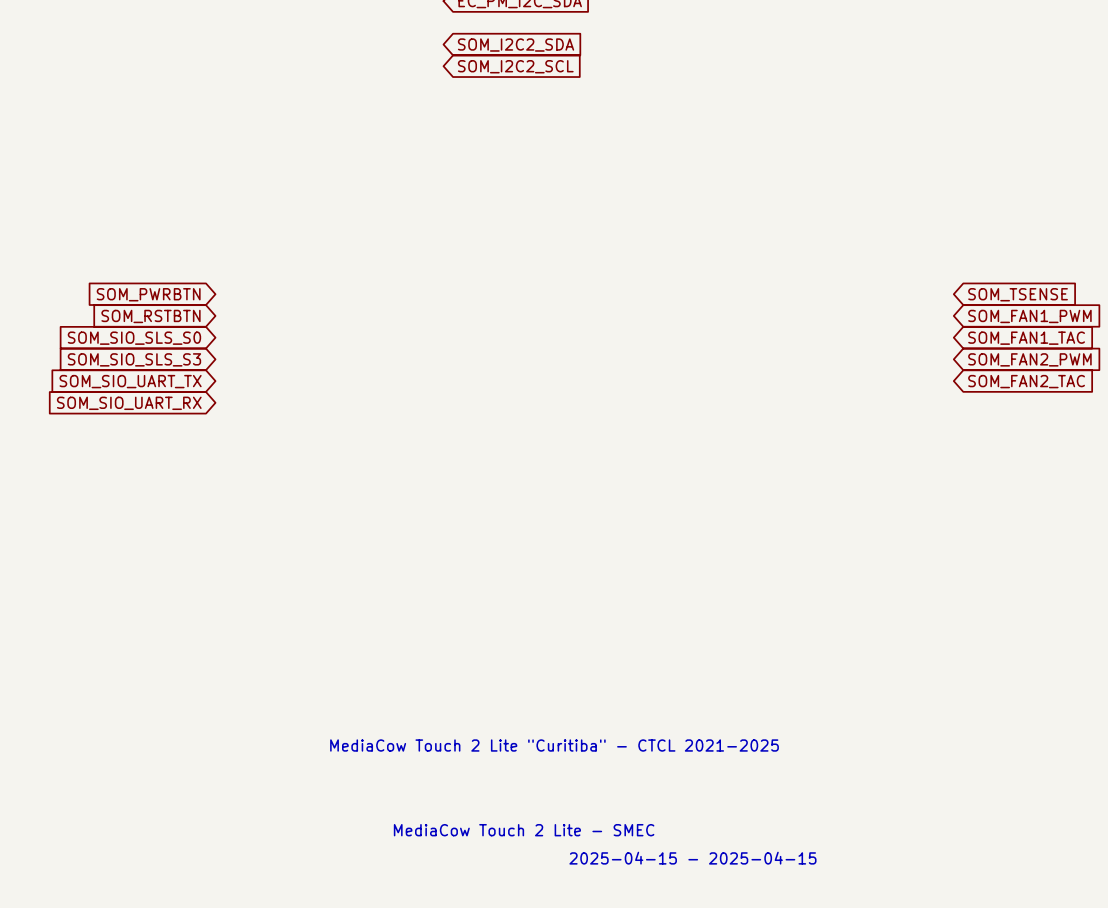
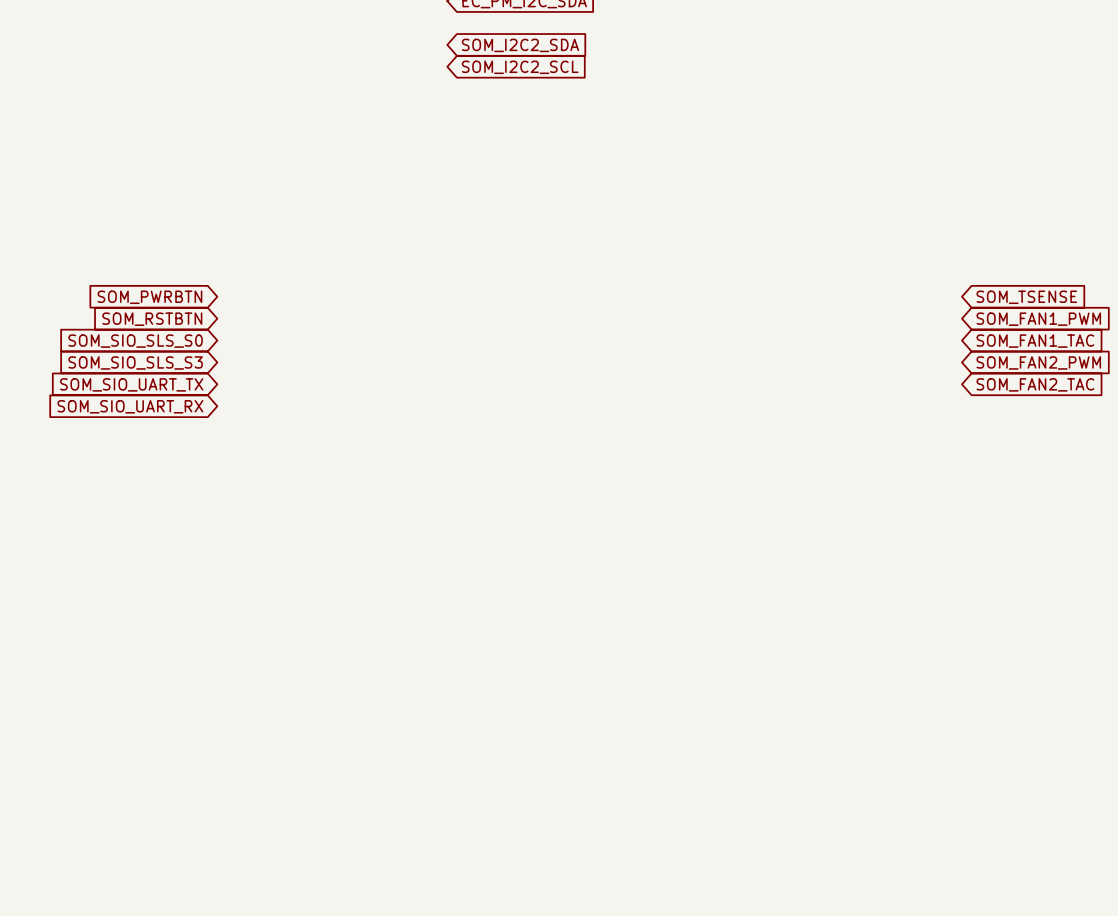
text: MediaCow Touch 2 Lite "Curitiba" - CTCL 2021-2025 (554, 745) -> none
text: MediaCow Touch 2 Lite - SMEC (524, 830) -> none
text: 2025-04-15 - 2025-04-15 (692, 858) -> none

